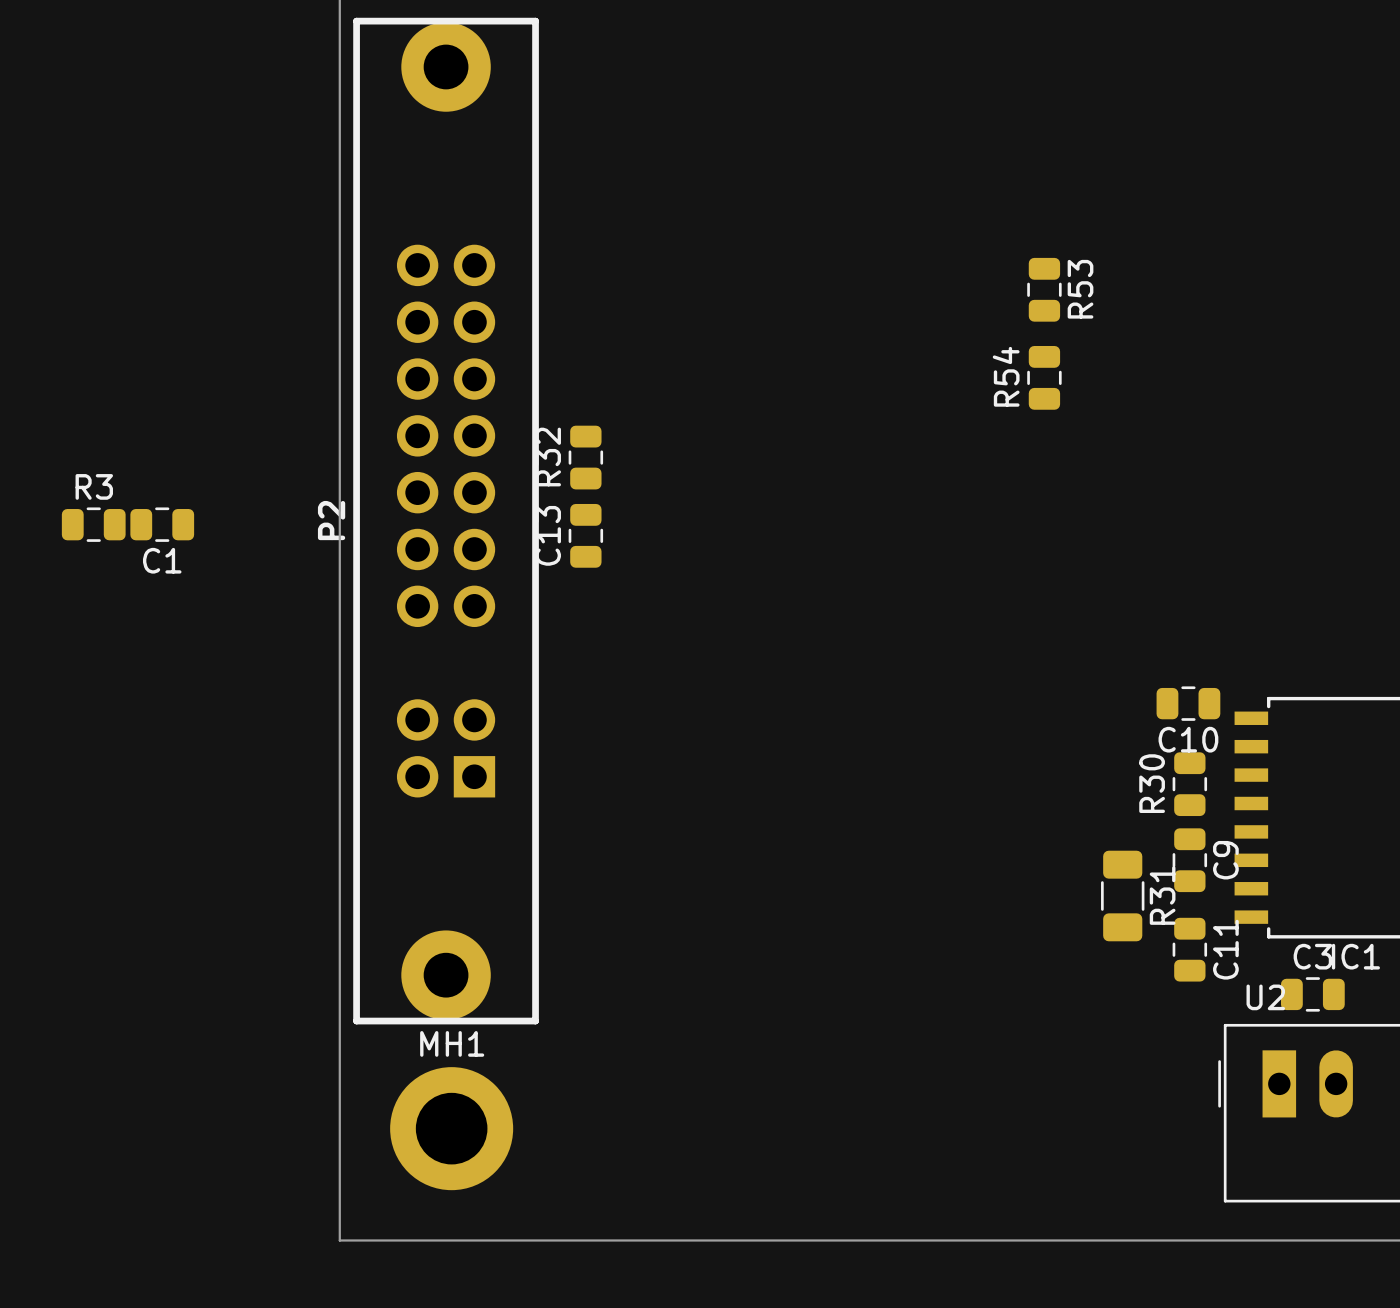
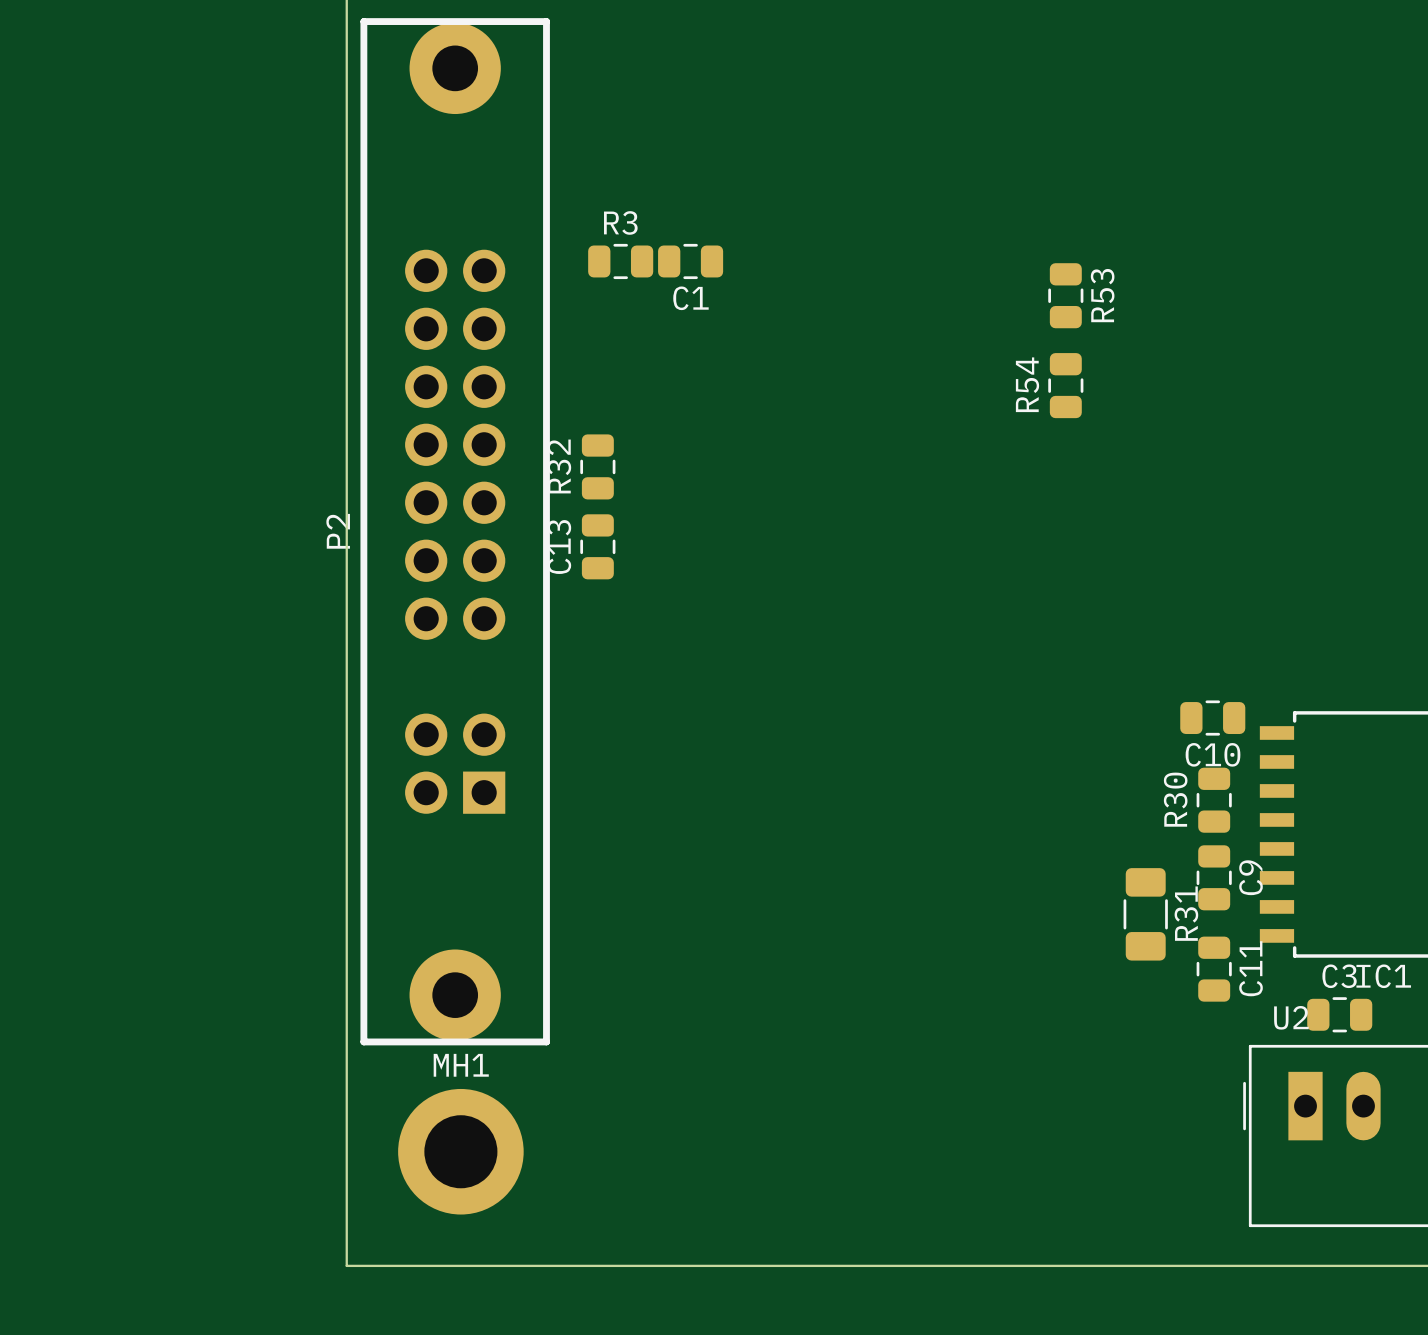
R3 position: (93, 524) -> (620, 261)
C1 position: (162, 524) -> (690, 261)

